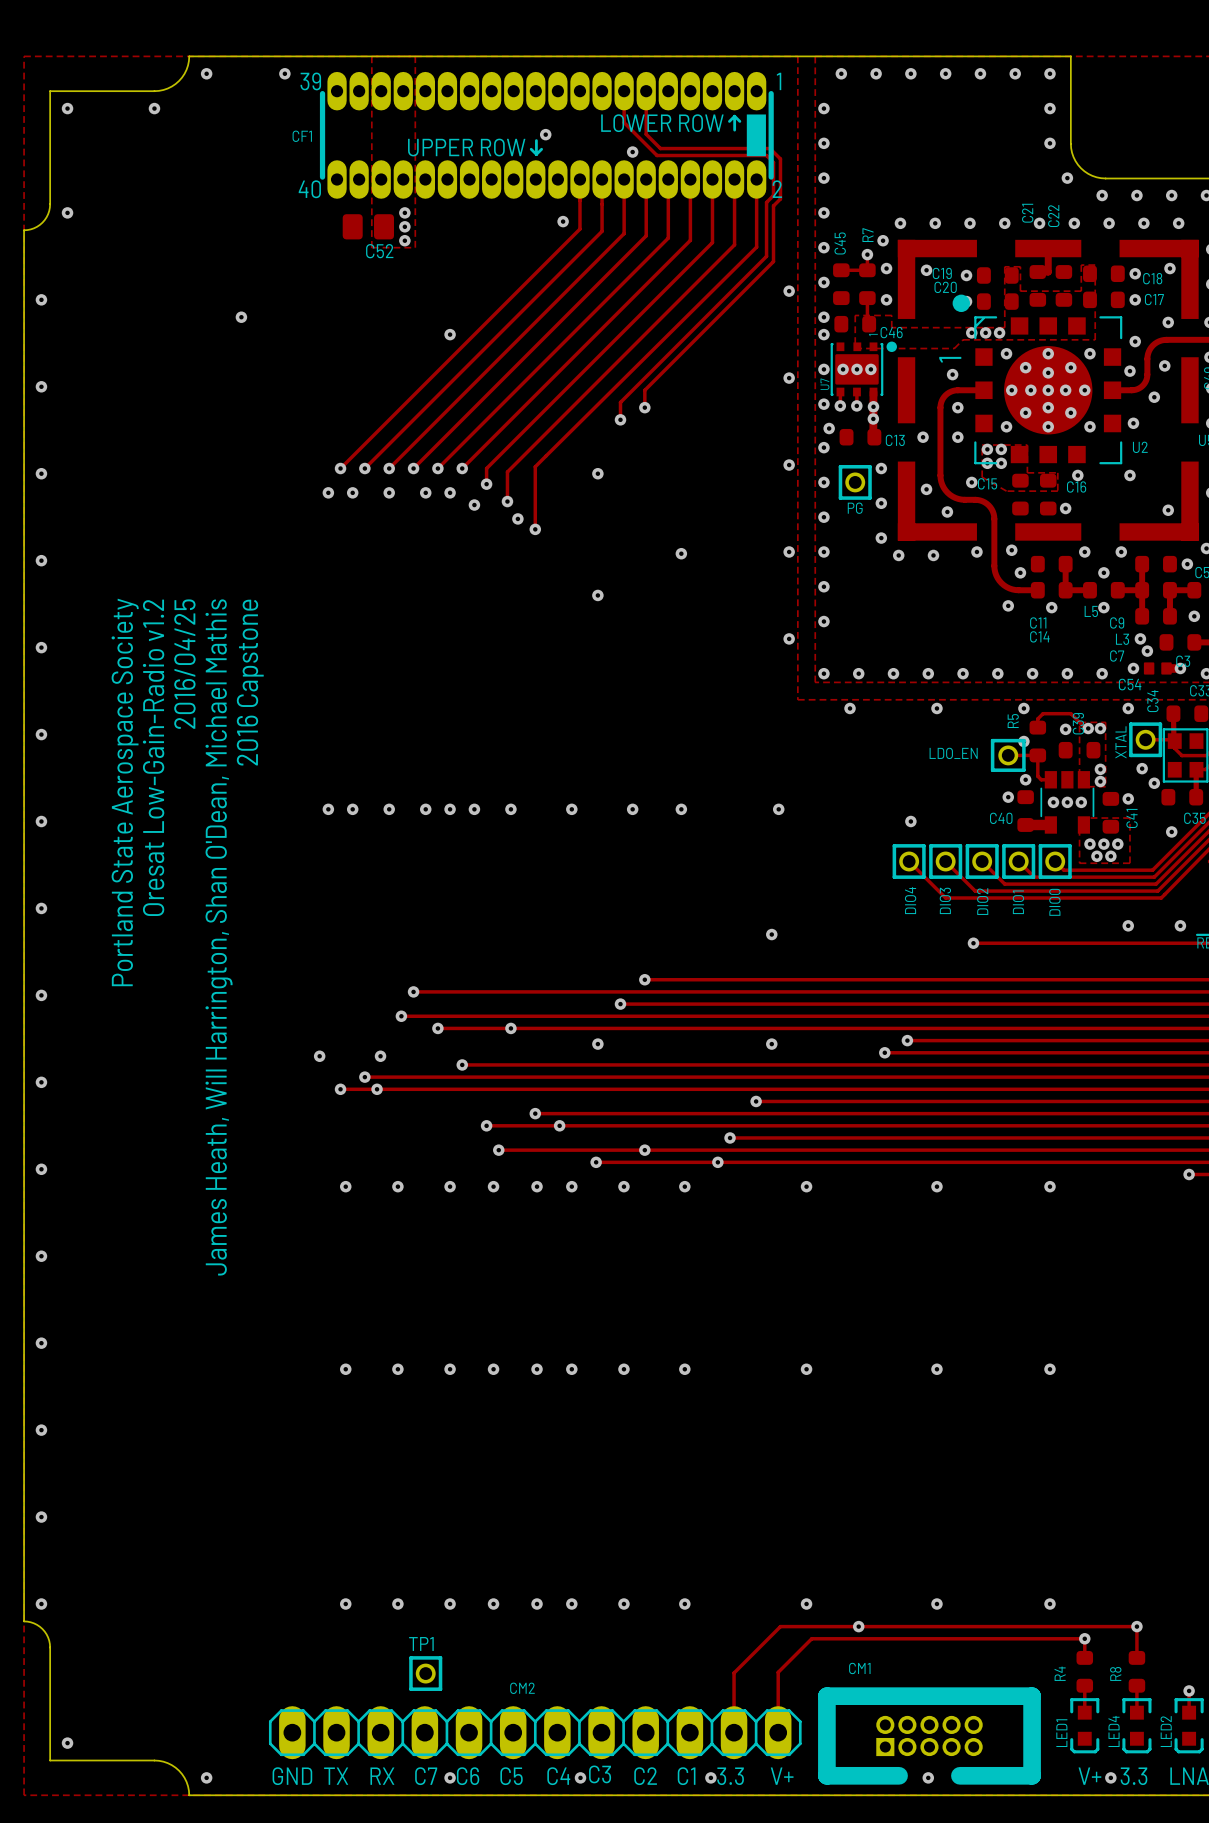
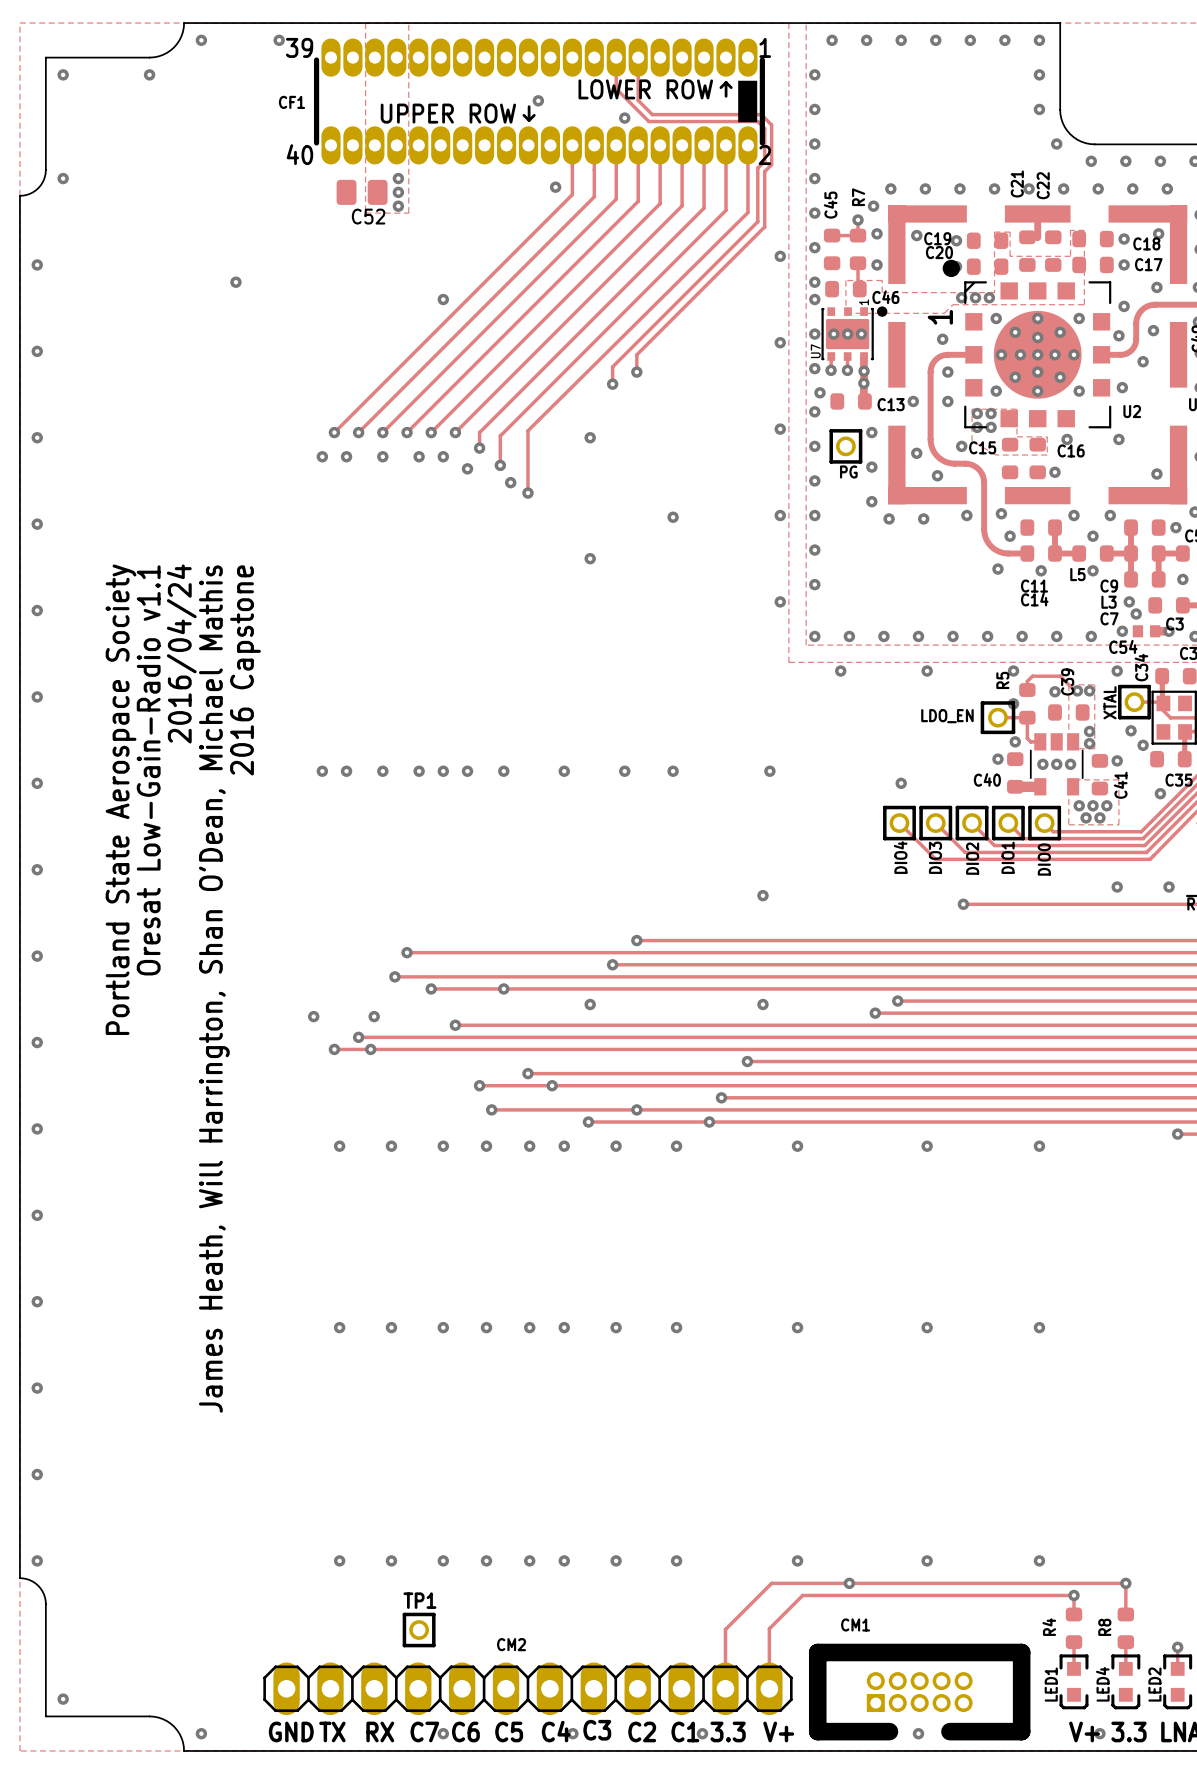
text: 2016/04/25 (184, 664) -> 2016/04/24 (181, 653)
text: Oresat Low-Gain-Radio v1.2 (153, 757) -> Oresat Low-Gain-Radio v1.1 (148, 770)

